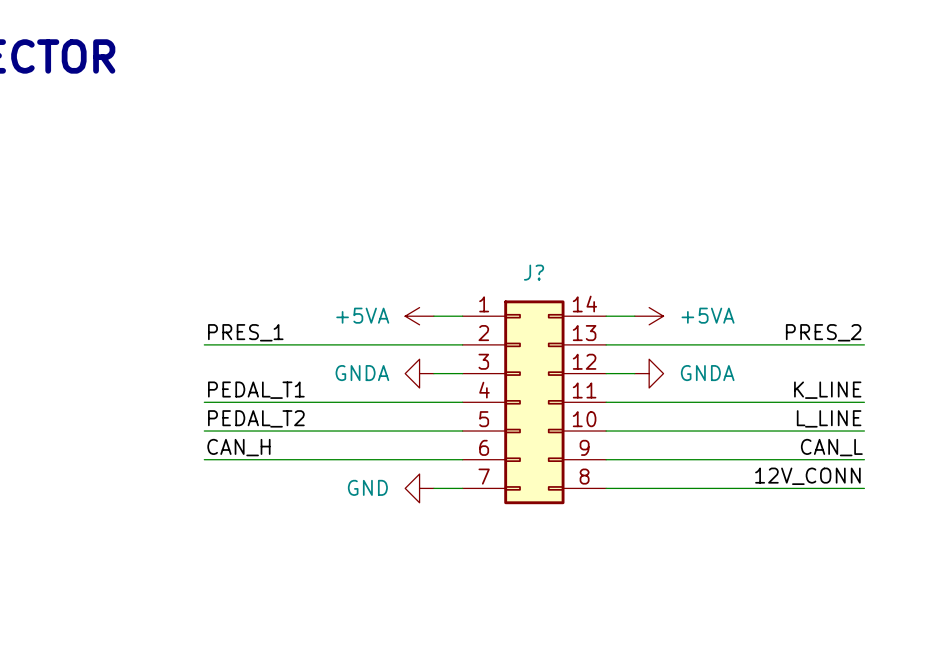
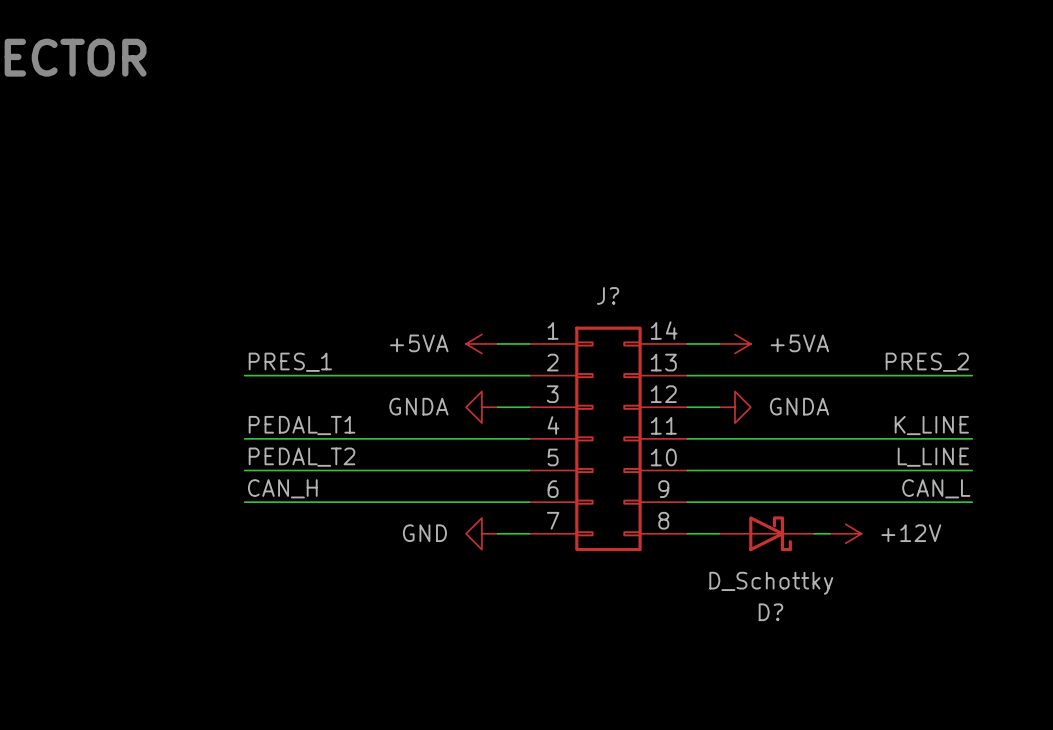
label: 12V_CONN (807, 476) -> none
D?: none -> D_Schottky (766, 533)
wire: (735, 488) (864, 488) -> none
power symbol: none -> +12V (845, 533)

